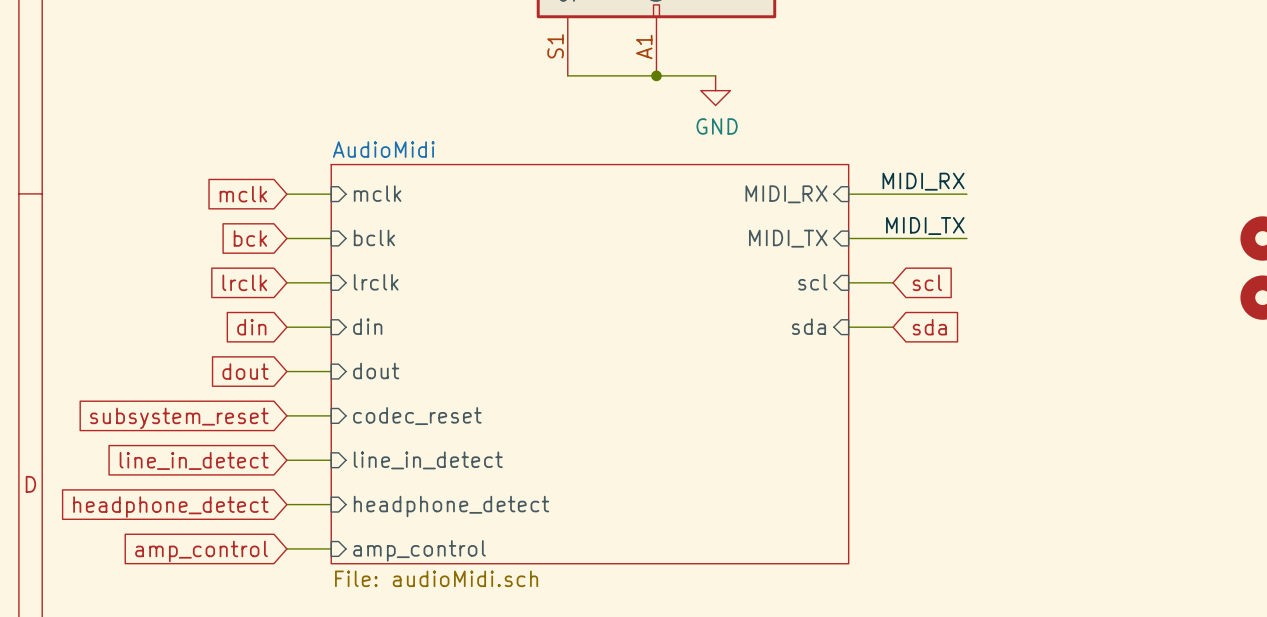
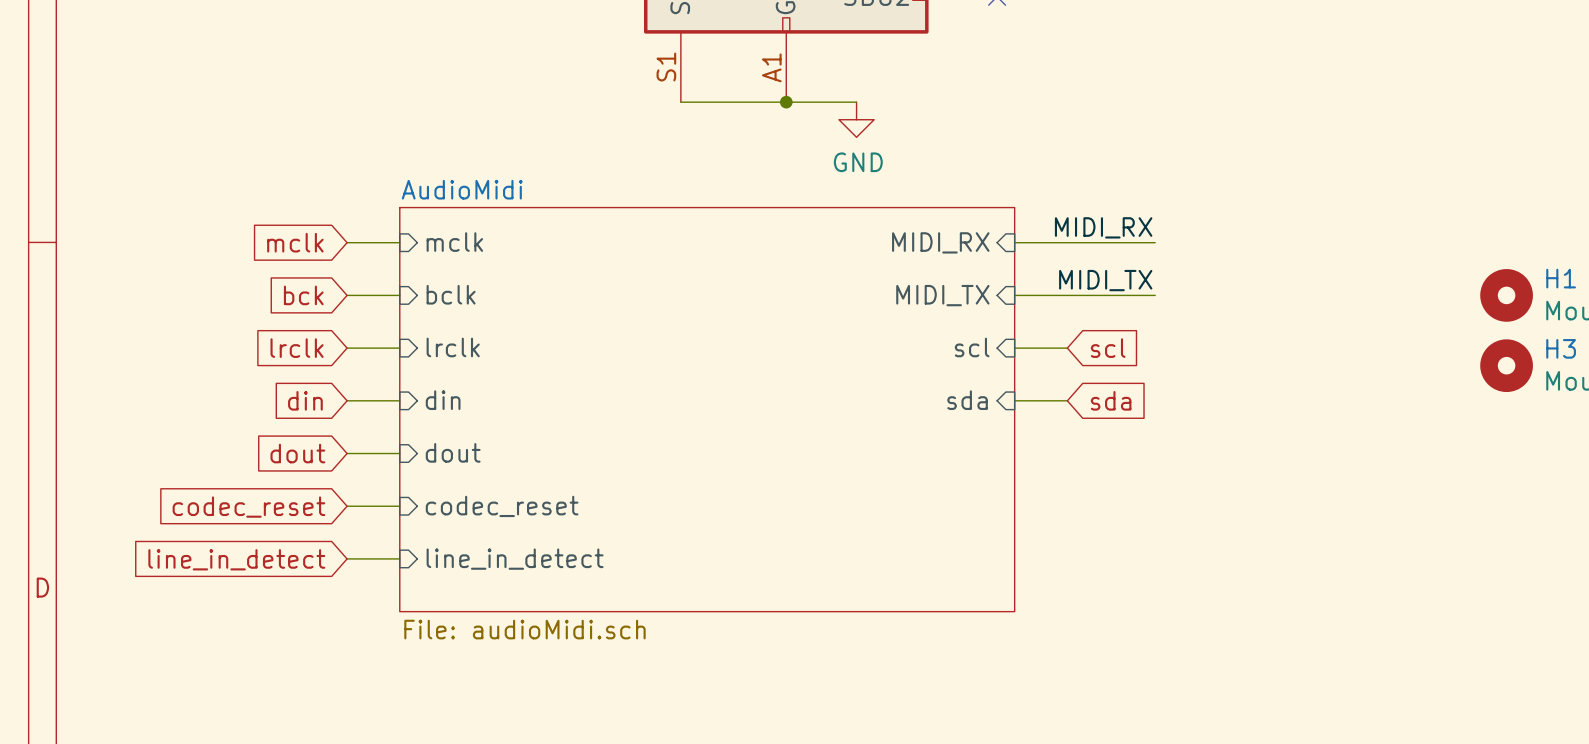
sheet AudioMidi: none -> File: audioMidi.sch (707, 409)
sheet AudioMidi: File: audioMidi.sch (589, 364) -> none
global label: subsystem_reset (179, 418) -> codec_reset (248, 507)
wire: (286, 504) (331, 504) -> none
sheet pin: headphone_detect (451, 506) -> none
global label: headphone_detect (170, 507) -> none
wire: (286, 548) (331, 548) -> none
sheet pin: amp_control (419, 550) -> none
global label: amp_control (201, 551) -> none

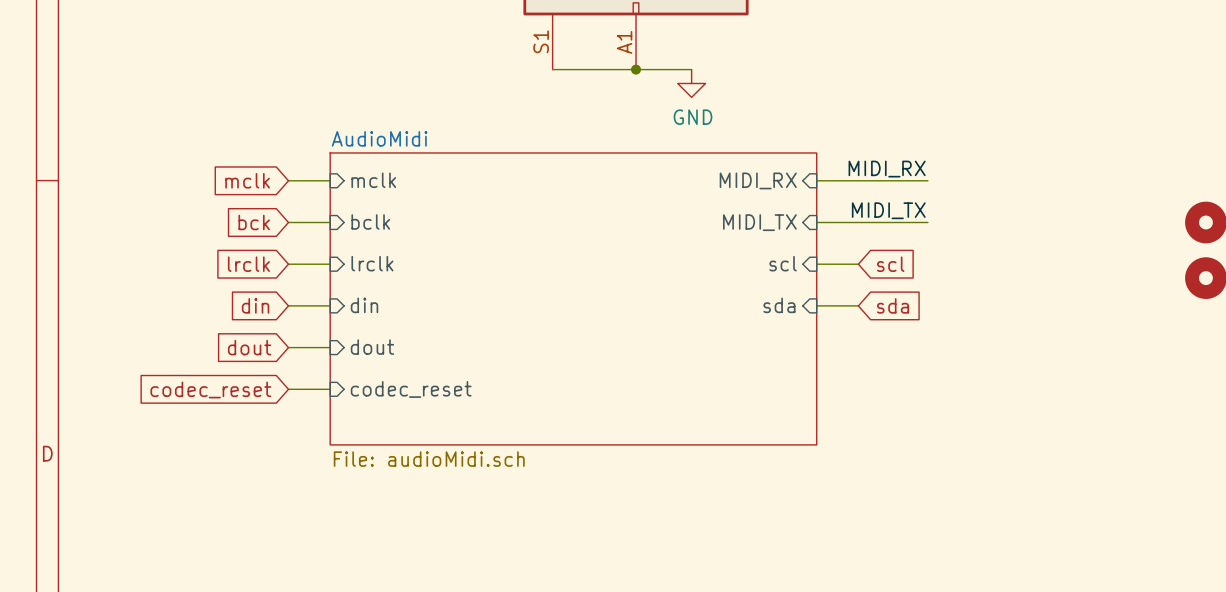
sheet AudioMidi: none -> File: audioMidi.sch (573, 298)
sheet AudioMidi: File: audioMidi.sch (707, 409) -> none
wire: (347, 558) (399, 558) -> none
global label: line_in_detect (236, 559) -> none
sheet pin: line_in_detect (515, 559) -> none

